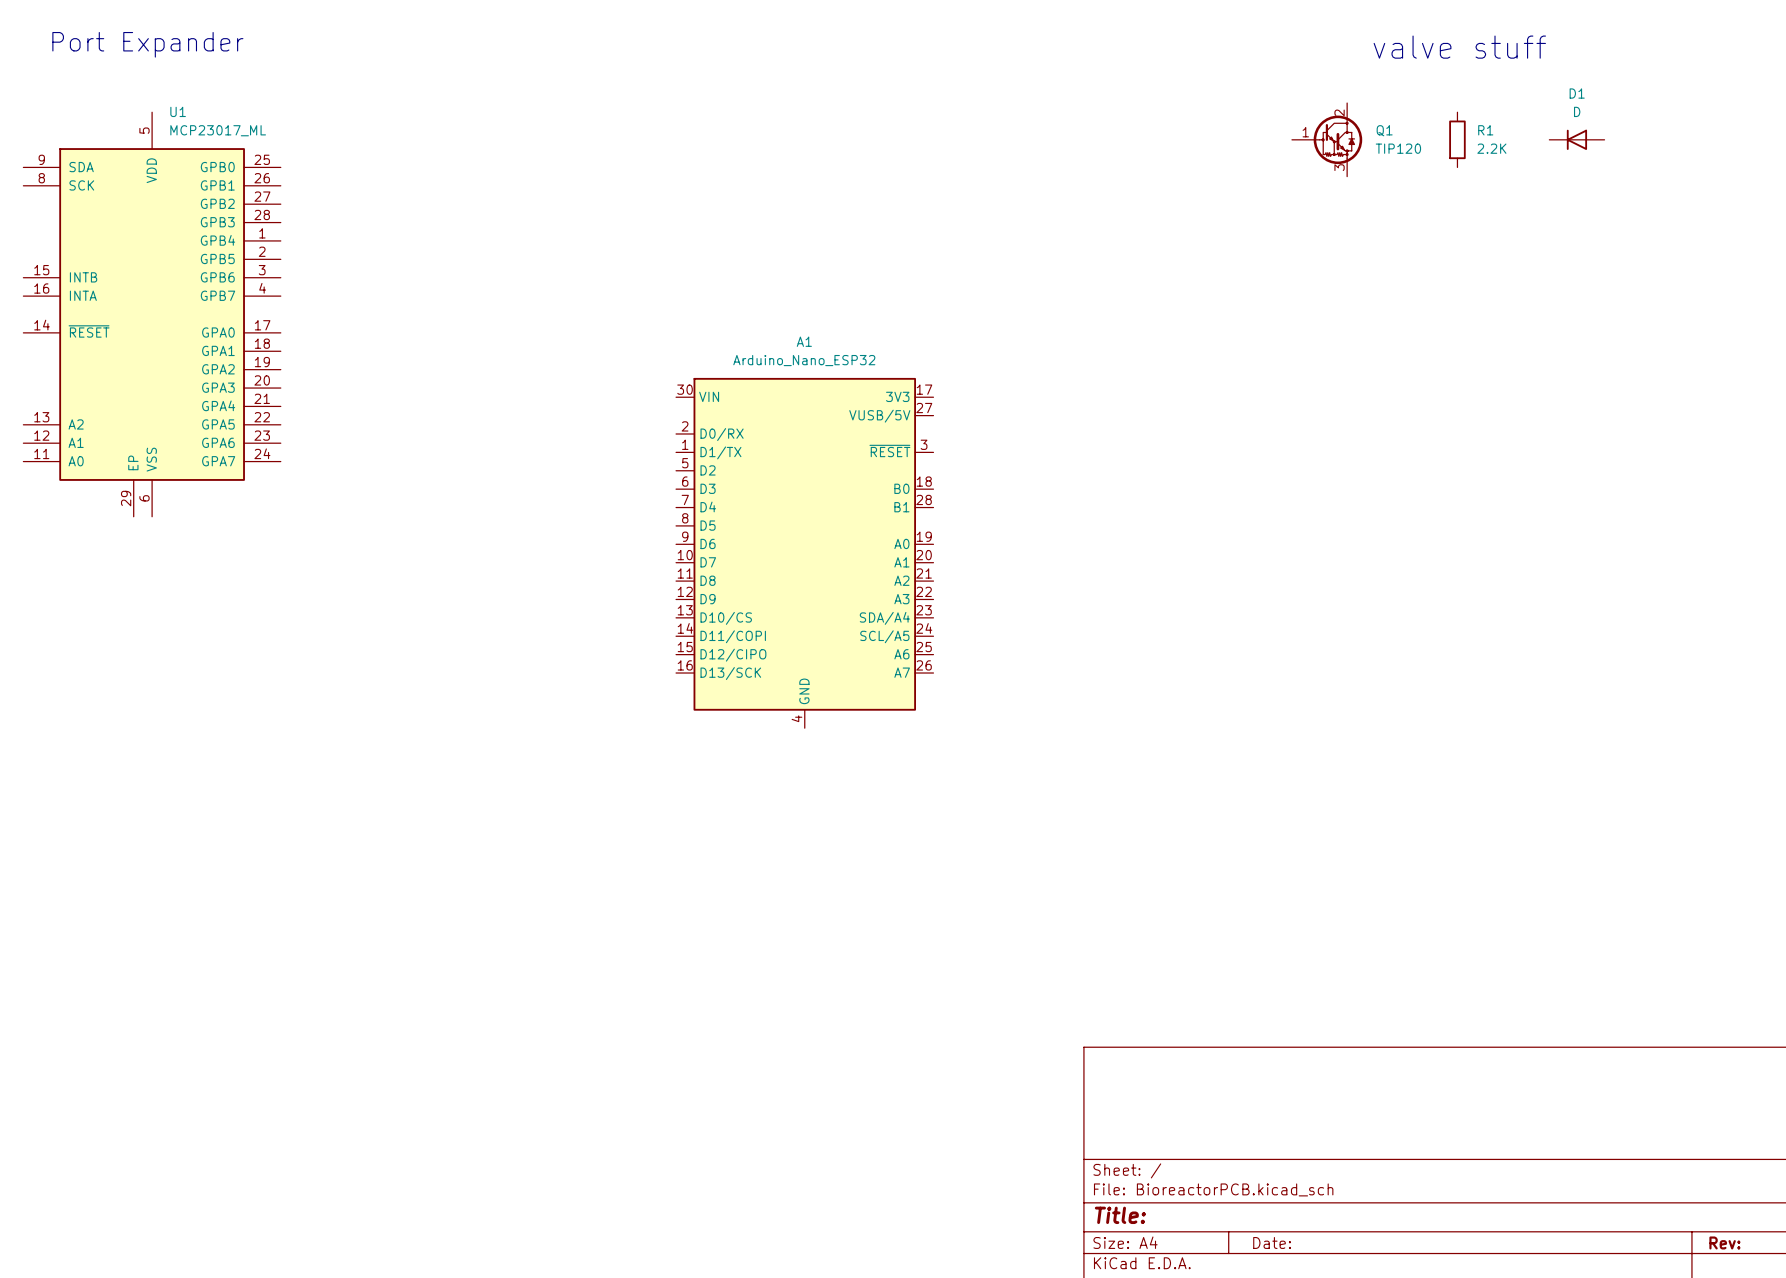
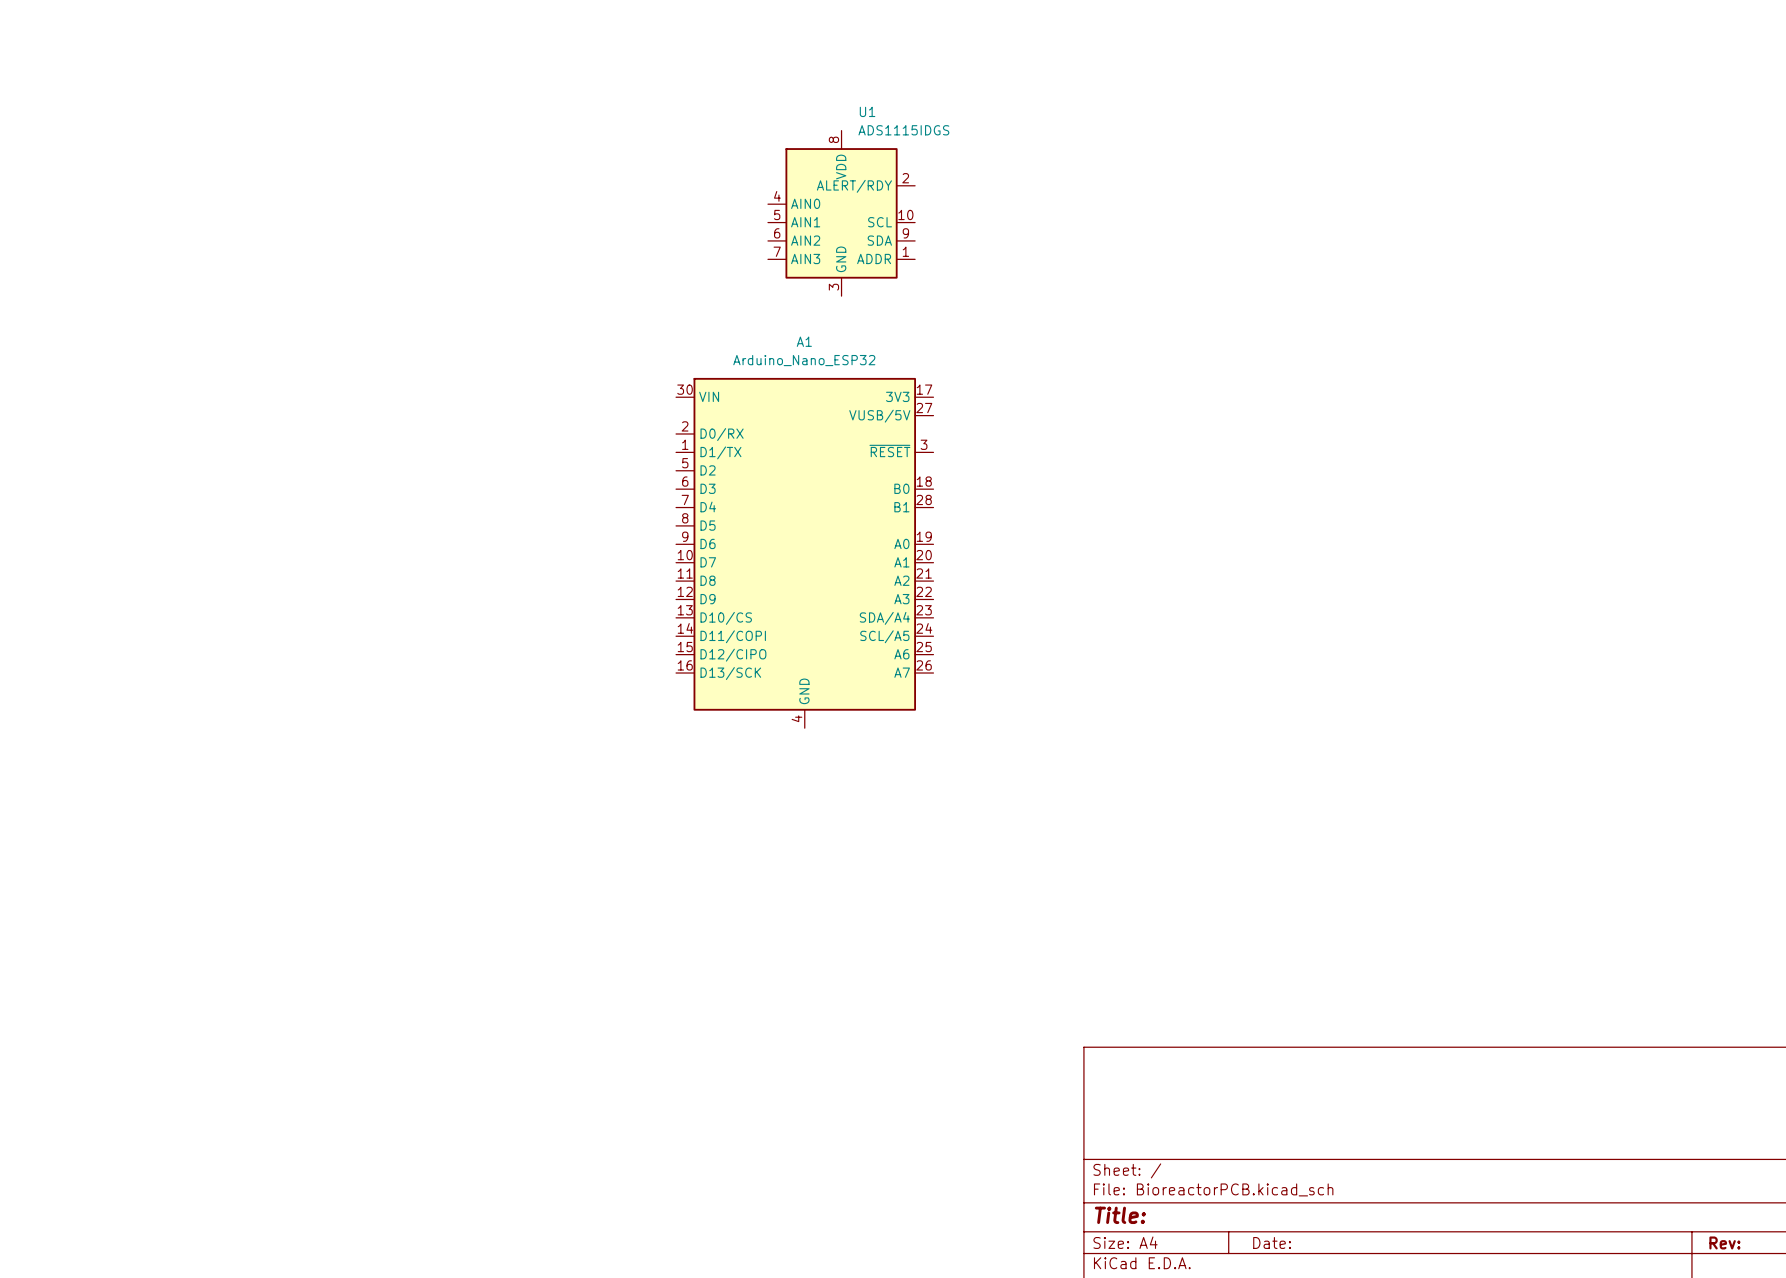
text: Port Expander (147, 44) -> none
text: valve stuff (1459, 47) -> none
U1 name position: U1 (178, 111) -> U1 (867, 111)
U1 symbol: [23, 112, 281, 517] -> [767, 130, 916, 297]
U1 value: MCP23017_ML (218, 130) -> ADS1115IDGS (903, 130)
Q1: TIP120 (1327, 139) -> none
R1: 2.2K (1457, 139) -> none
D1: D (1576, 139) -> none

